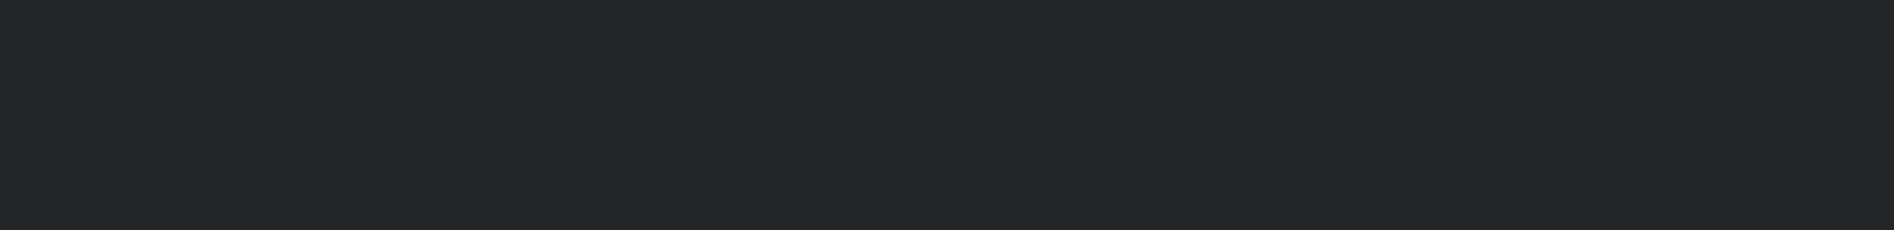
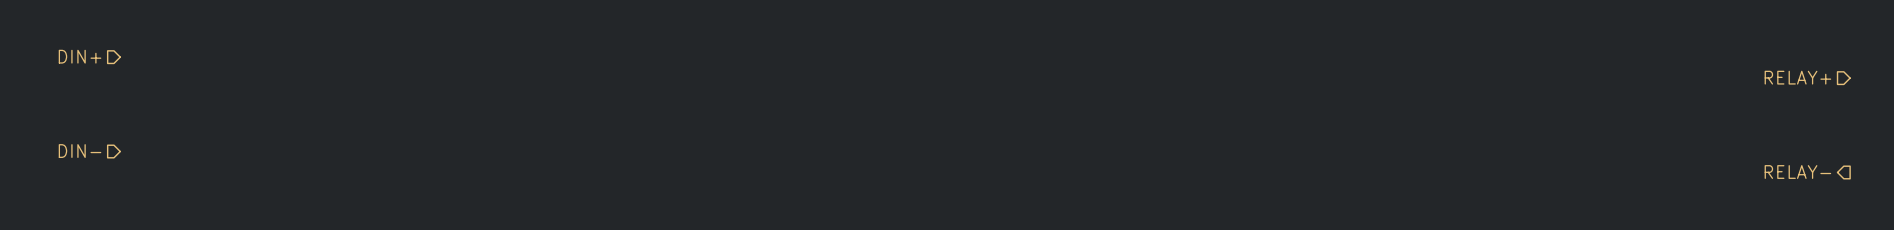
hierarchical label: none -> DIN+ (80, 56)
hierarchical label: none -> RELAY+ (1797, 77)
hierarchical label: none -> DIN- (80, 151)
hierarchical label: none -> RELAY- (1797, 172)

